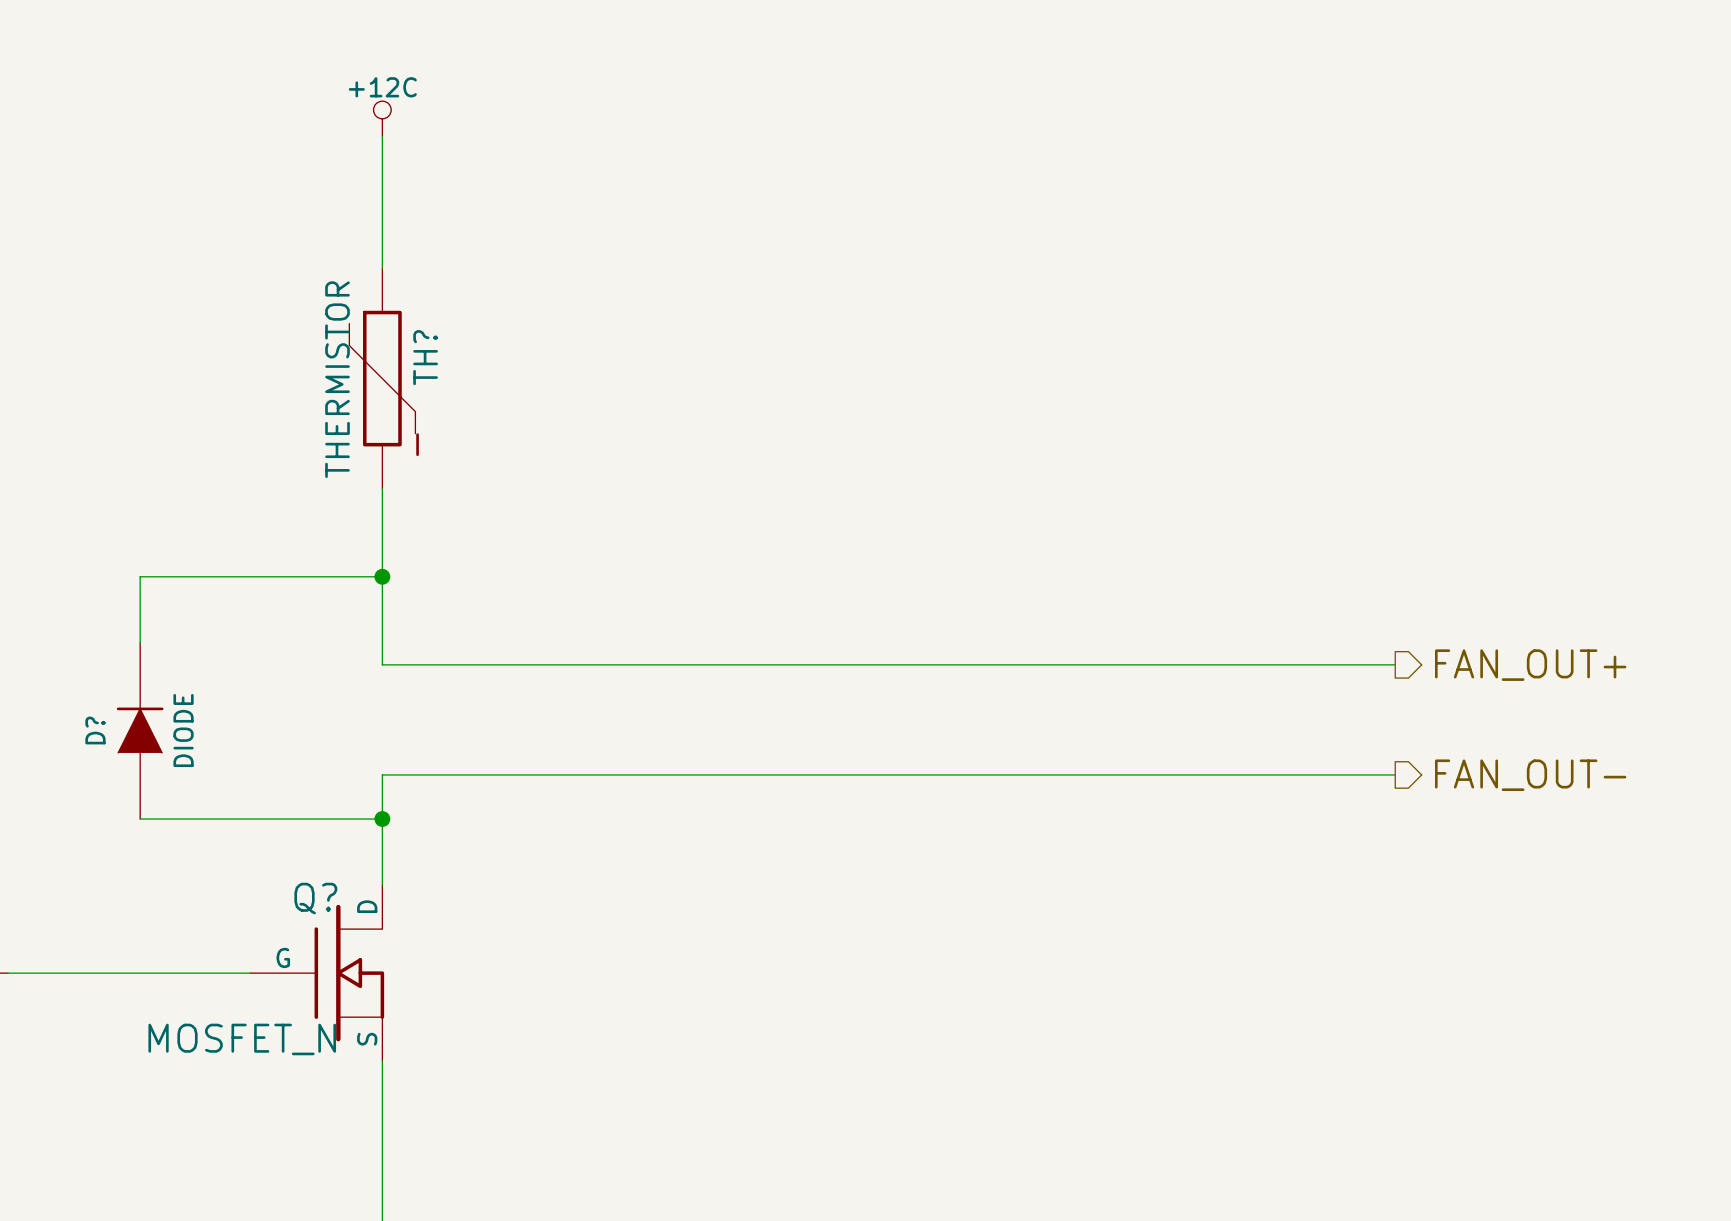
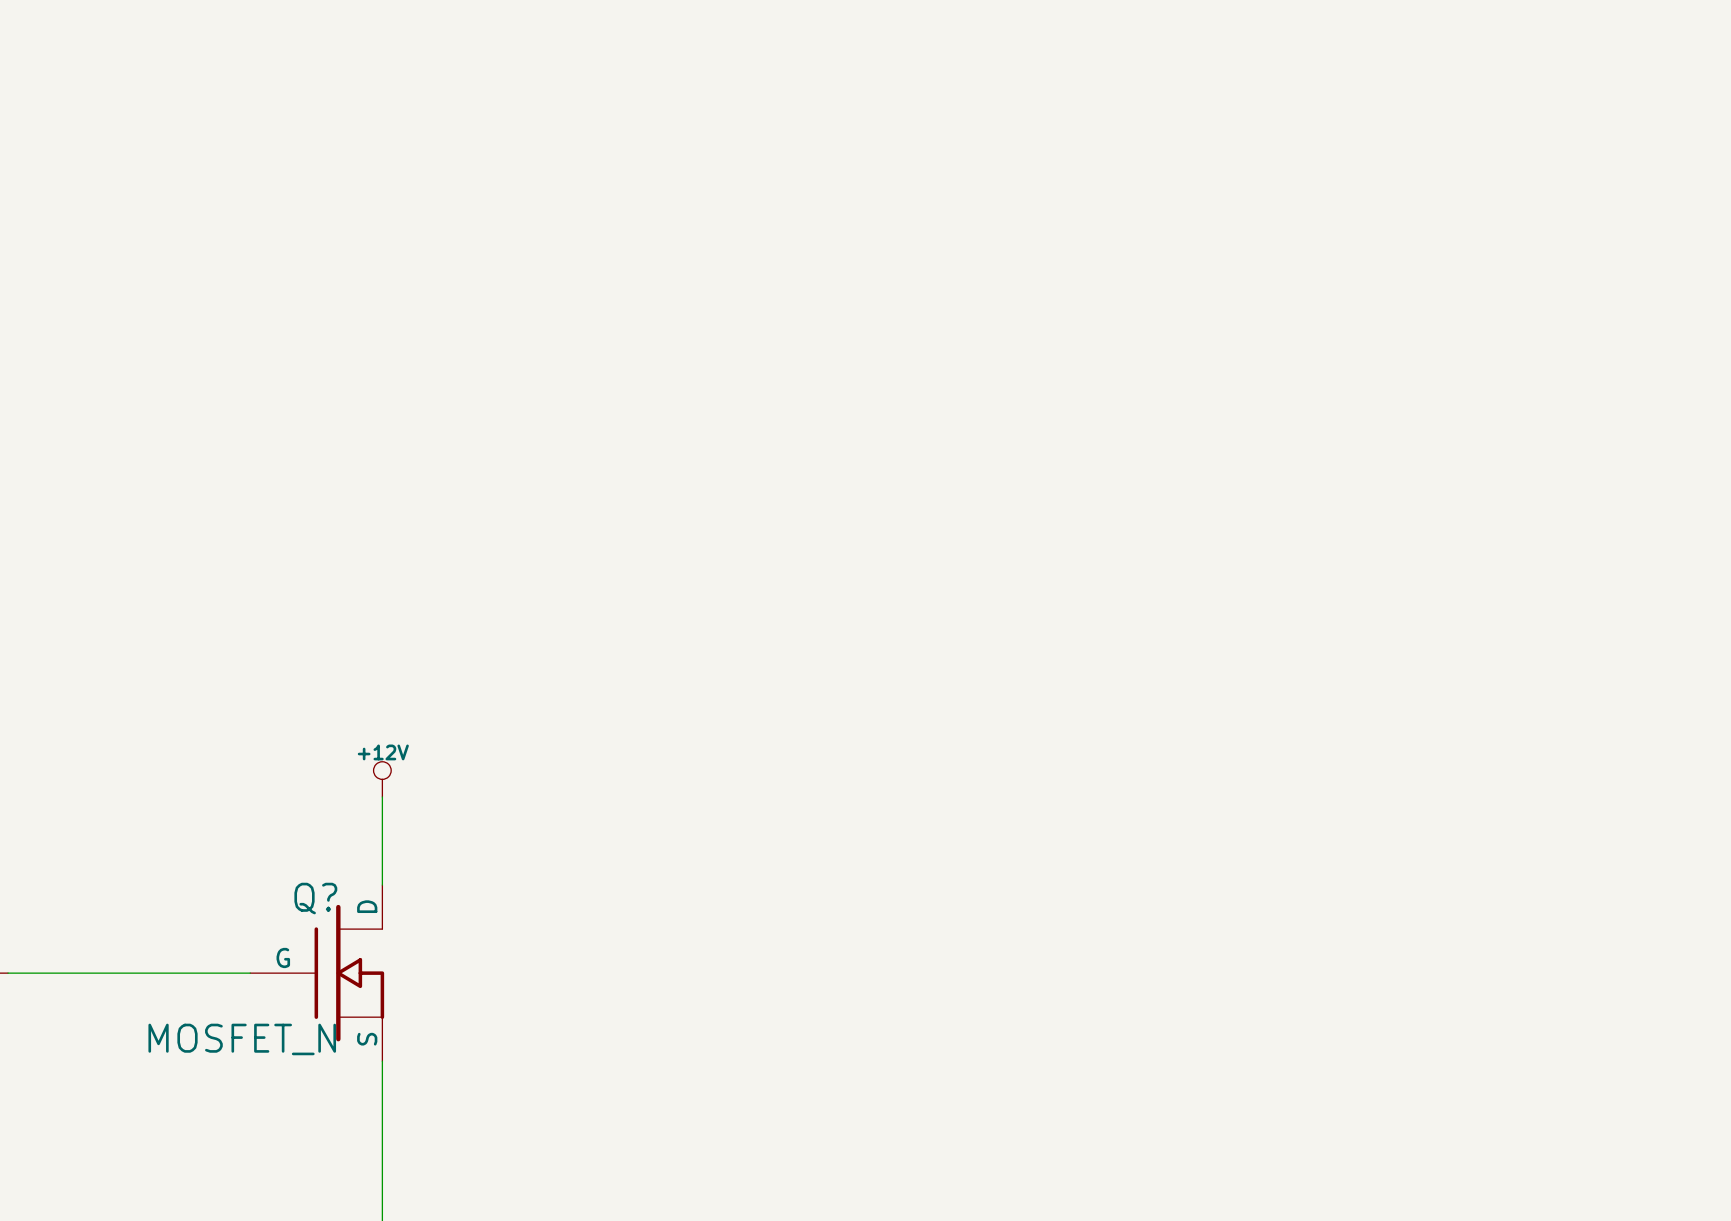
power symbol: +12C (382, 118) -> none
wire: (382, 136) (382, 268) -> none
TH?: THERMISTOR (382, 378) -> none
wire: (382, 488) (382, 664) (1395, 664) -> none
wire: (382, 576) (140, 576) (140, 642) -> none
junction: (382, 576) -> none
hierarchical label: FAN_OUT+ (1530, 665) -> none
D?: DIODE (140, 730) -> none
wire: (1395, 774) (382, 774) (382, 796) -> none
hierarchical label: FAN_OUT- (1530, 775) -> none
power symbol: none -> +12V (382, 779)
wire: (140, 819) (382, 819) -> none
junction: (382, 819) -> none

